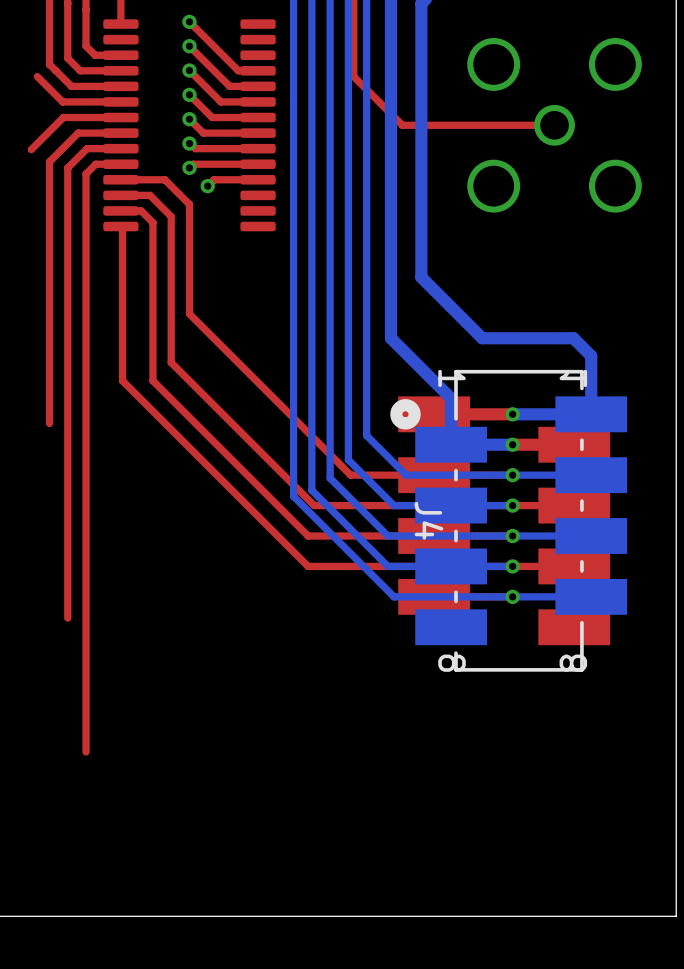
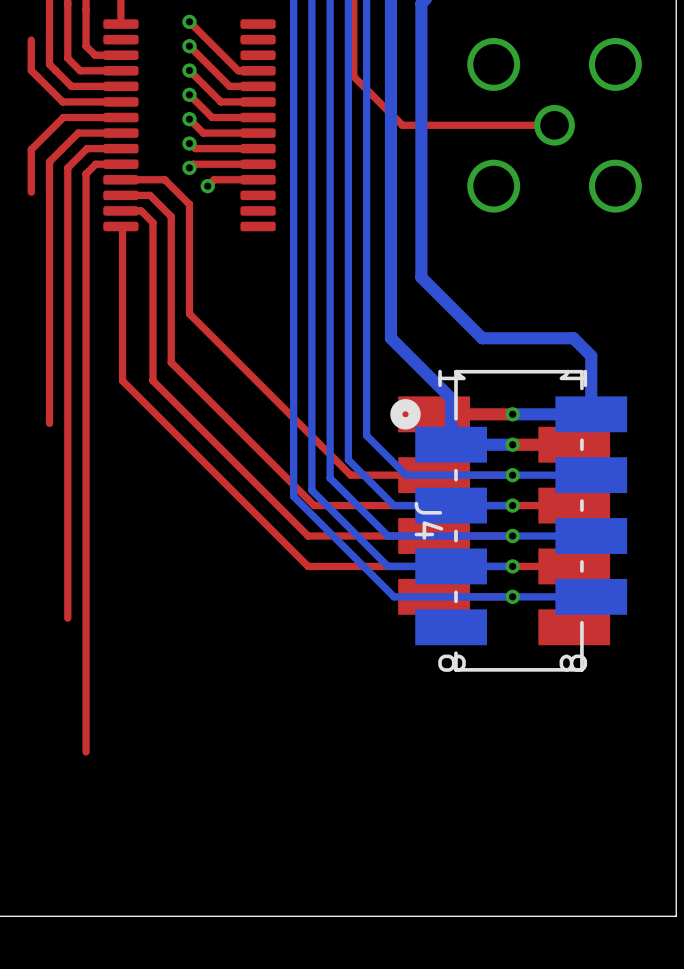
top track: none -> (31, 40) (31, 70) (37, 76)
top track: none -> (31, 149) (31, 192)

